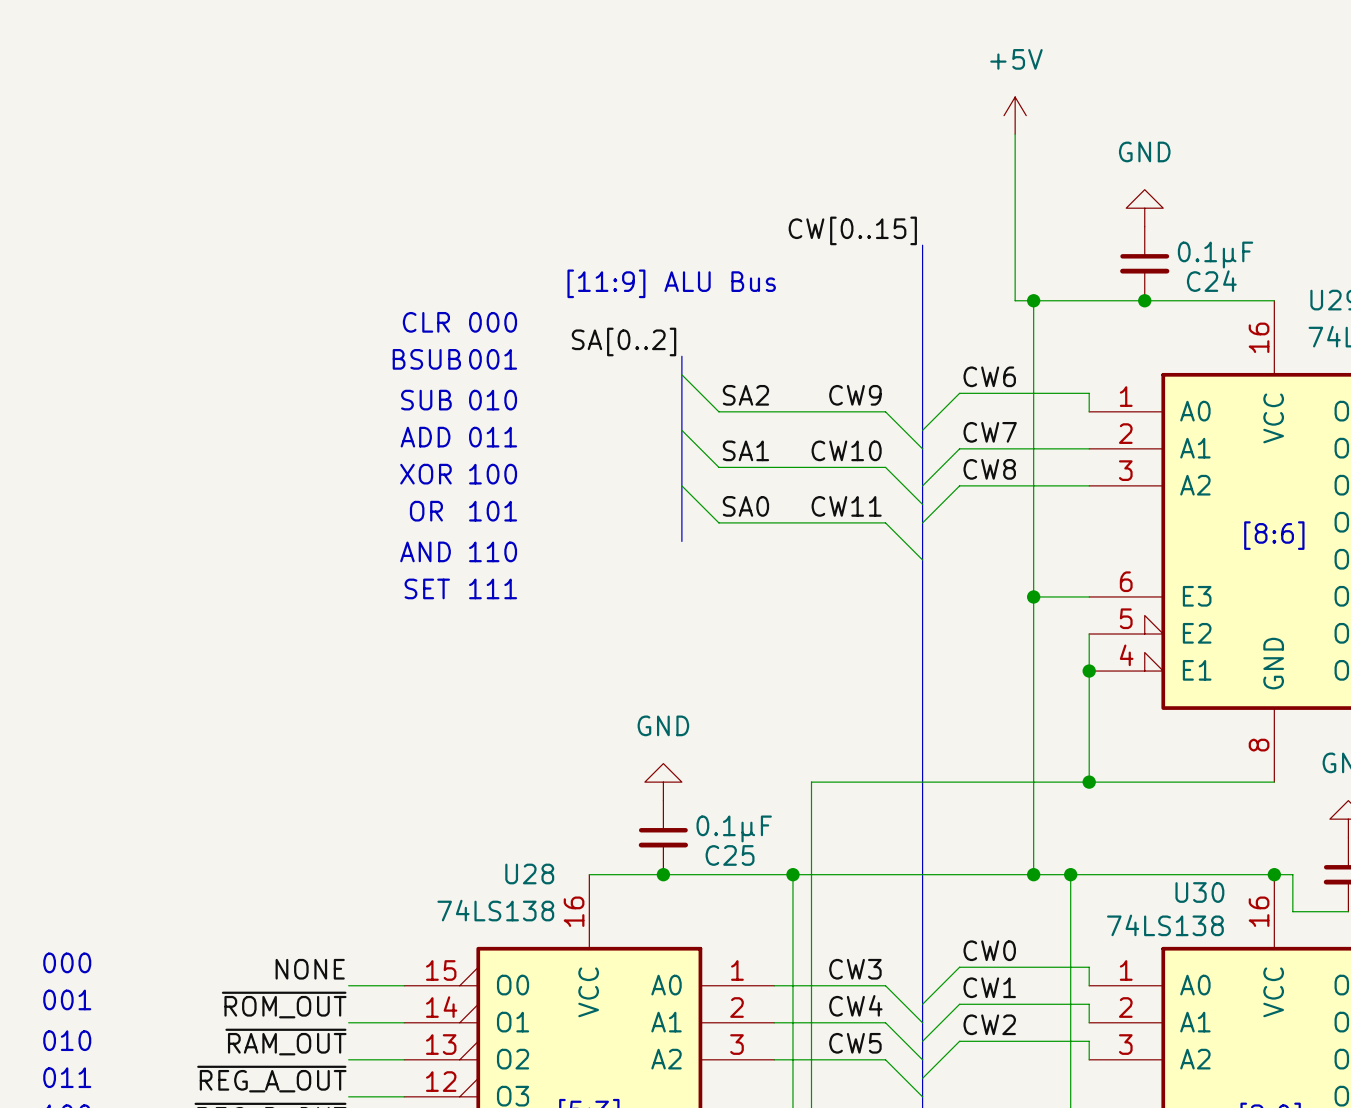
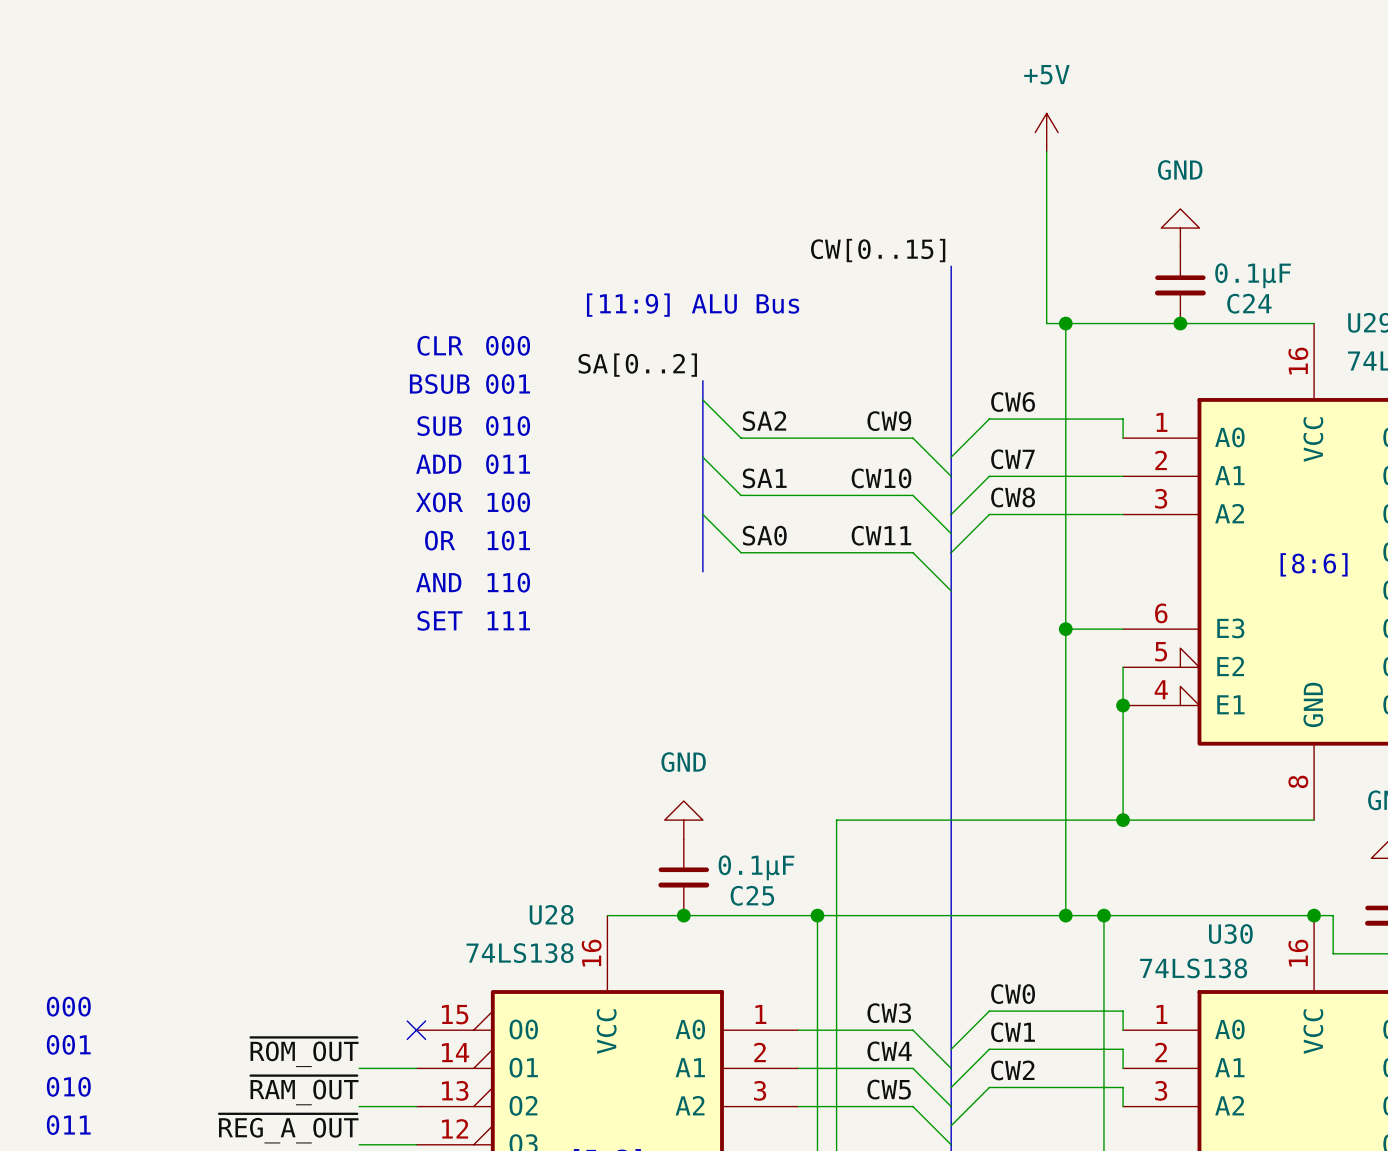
label: NONE (310, 969) -> none
wire: (348, 985) (404, 985) -> none
no-connect mark: none -> (416, 1030)

